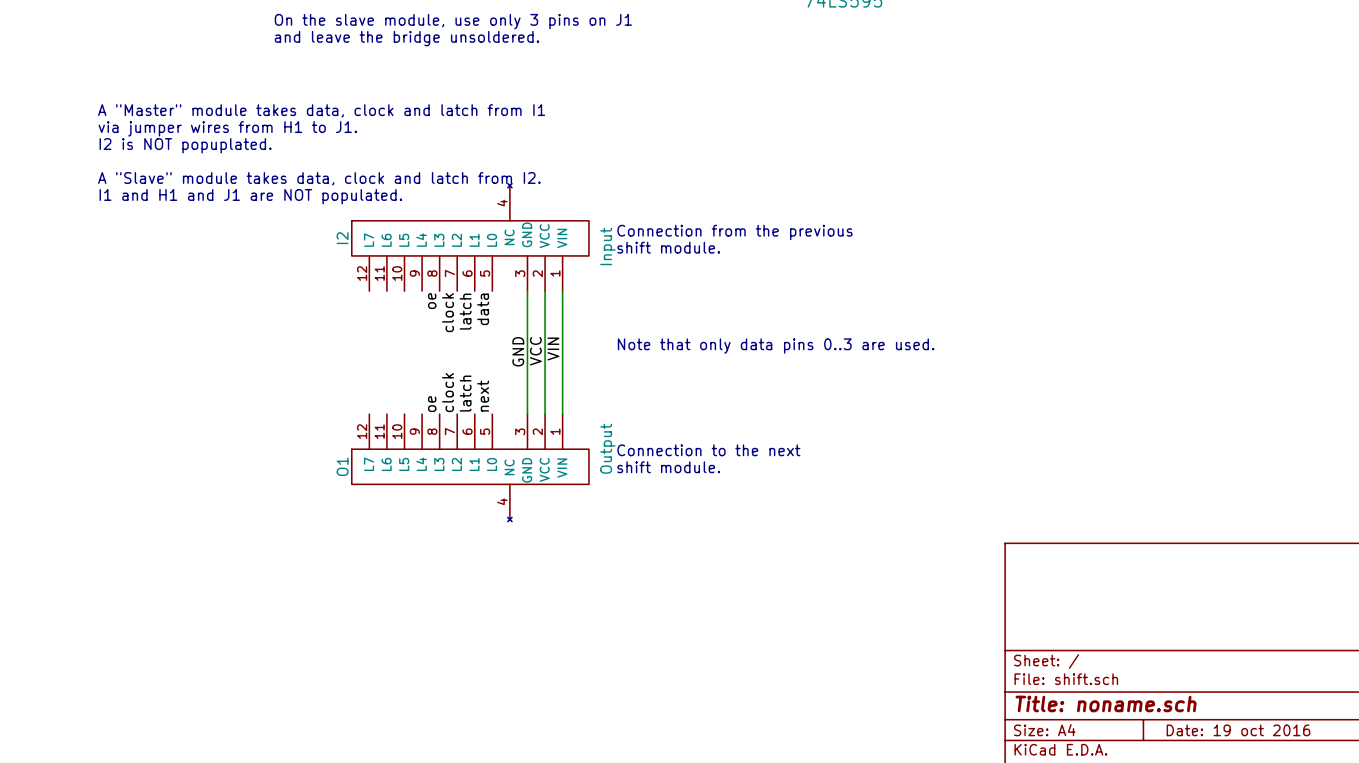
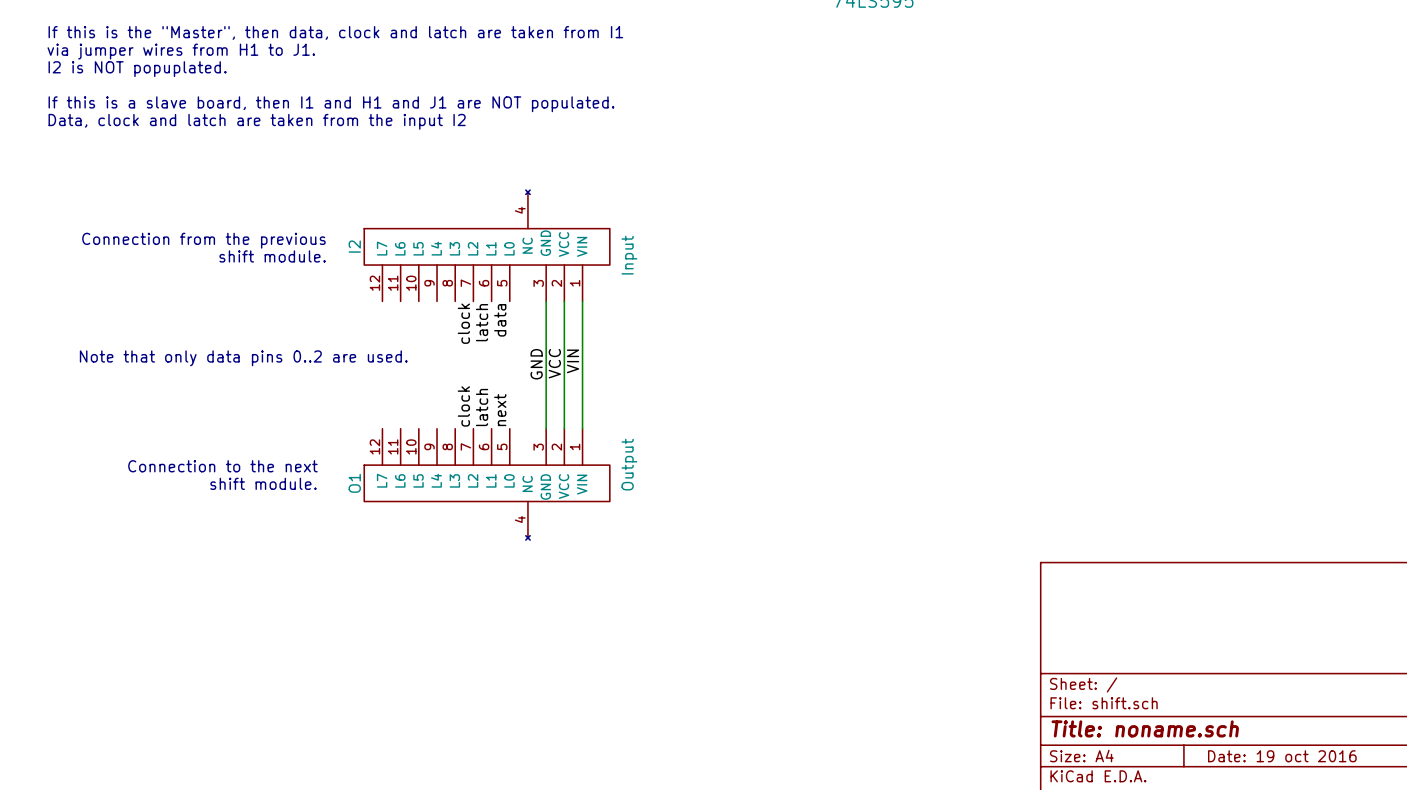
text: On the slave module, use only 3 pins on J1 (453, 21) -> none
text: none -> If this is the "Master", then data, clock and latch are taken from I1 (335, 32)
text: and leave the bridge unsoldered. (406, 38) -> none
text: none -> If this is a slave board, then I1 and H1 and J1 are NOT populated. (331, 104)
text: A "Master" module takes data, clock and latch from I1 (321, 110) -> none
text: none -> Data, clock and latch are taken from the input I2 (257, 121)
text position: via jumper wires from H1 to J1. (227, 128) -> via jumper wires from H1 to J1. (181, 51)
text position: I2 is NOT popuplated. (185, 145) -> I2 is NOT popuplated. (137, 69)
text: A "Slave" module takes data, clock and latch from I2. (319, 178) -> none
text: I1 and H1 and J1 are NOT populated. (250, 196) -> none
text: none -> Connection from the previous (203, 240)
text: Connection from the previous (734, 232) -> none
text: none -> shift module. (272, 256)
text: shift module. (668, 247) -> none
label: oe (432, 301) -> none
text: none -> Note that only data pins 0..2 are used. (243, 358)
text: Note that only data pins 0..3 are used. (776, 346) -> none
label: oe (432, 404) -> none
text: none -> Connection to the next (222, 466)
text: Connection to the next (708, 450) -> none
text: none -> shift module. (263, 483)
text: shift module. (668, 467) -> none

